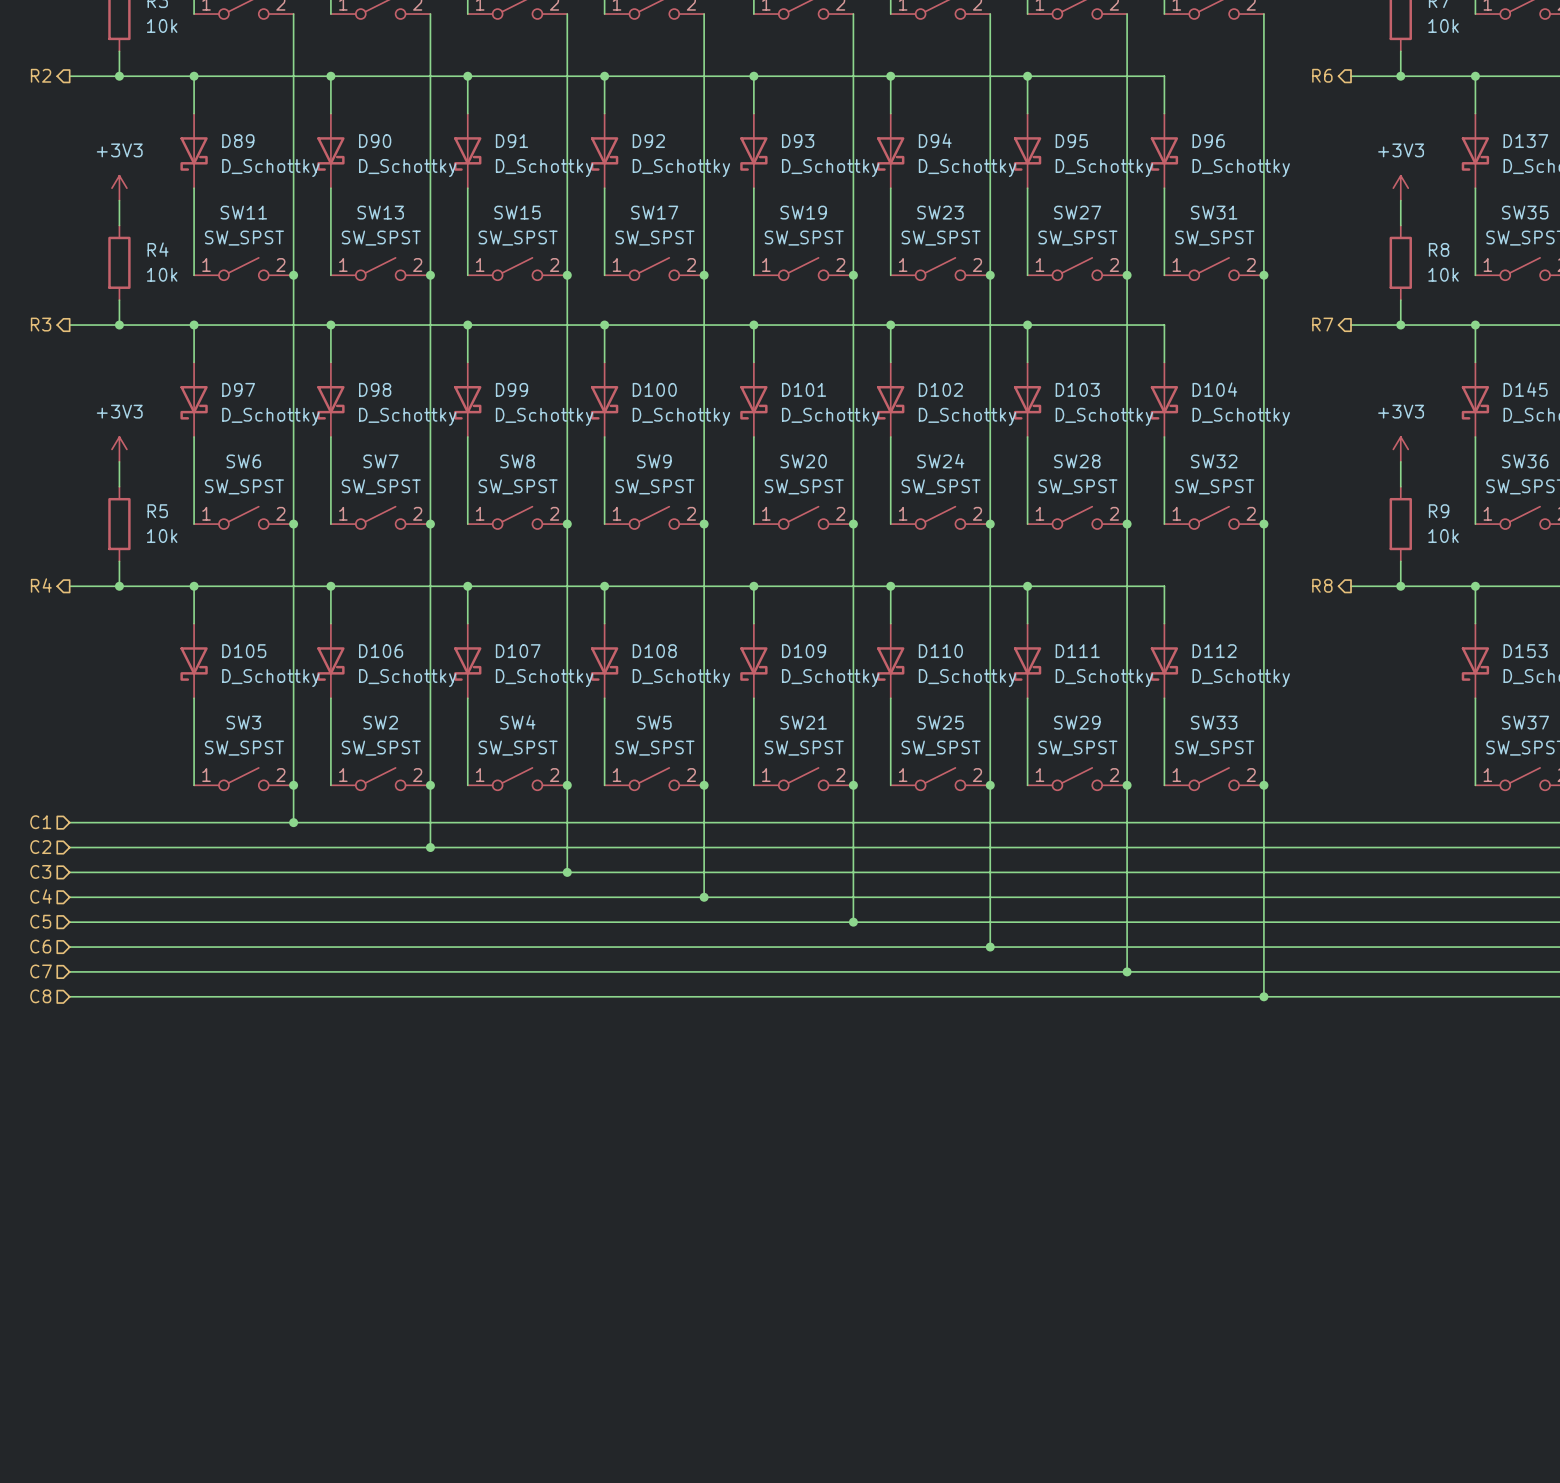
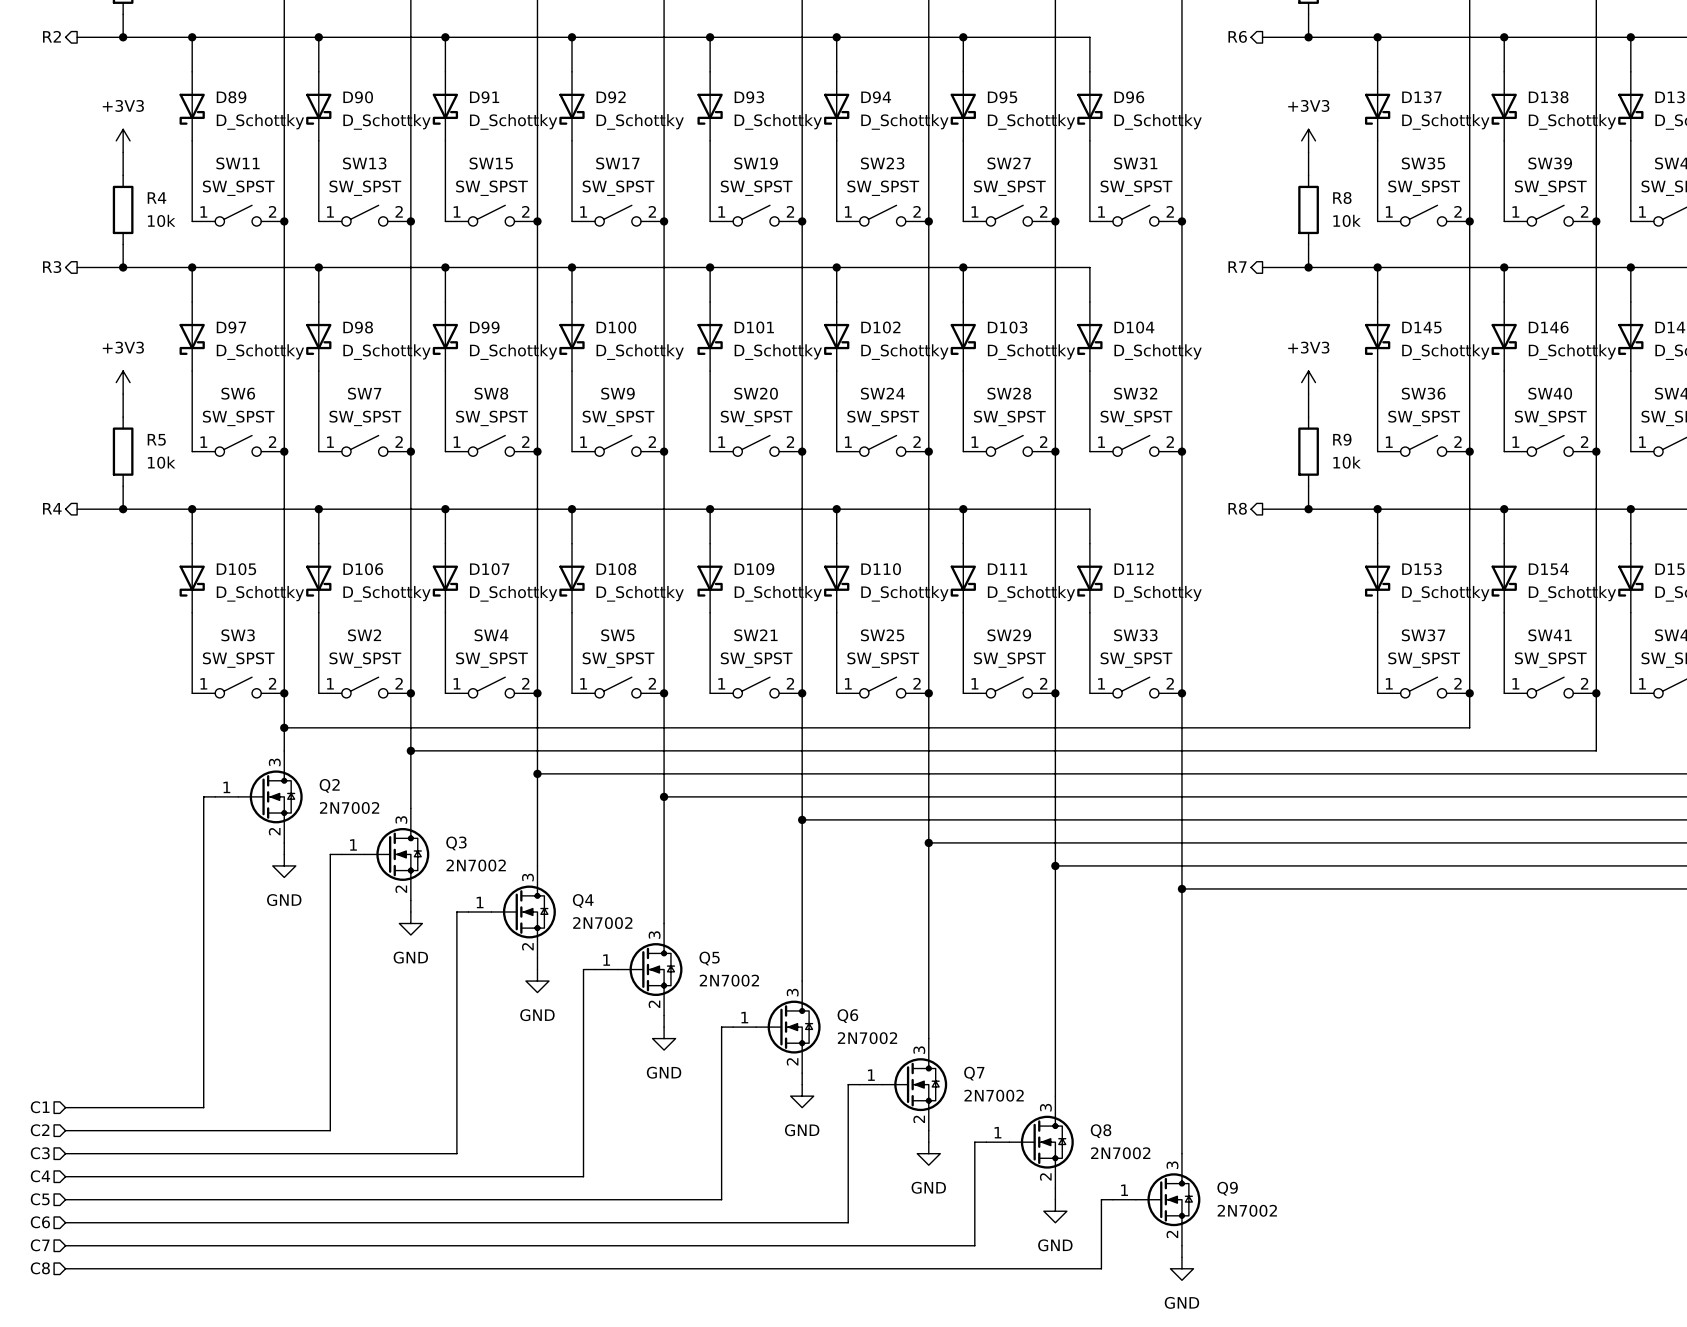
hierarchical label: C1 (40, 822) -> none
wire: (69, 822) (293, 822) -> (284, 750) (284, 727)
hierarchical label: C2 (40, 847) -> none
wire: (69, 847) (430, 847) -> (410, 808) (410, 750)
hierarchical label: C3 (40, 871) -> none
wire: (69, 872) (567, 872) -> (537, 865) (537, 773)
hierarchical label: C4 (41, 896) -> none
wire: (69, 897) (206, 897) -> (65, 1107) (203, 1107) (203, 796)
wire: (218, 897) (704, 897) -> (664, 923) (664, 796)
Q2: none -> 2N7002 (258, 796)
hierarchical label: C5 (40, 921) -> none
wire: (69, 922) (853, 922) -> (802, 981) (802, 819)
hierarchical label: C6 (40, 946) -> none
wire: (69, 947) (990, 947) -> (928, 1038) (928, 842)
wire: none -> (284, 842) (284, 854)
wire: none -> (341, 854) (330, 854) (330, 1130) (65, 1130)
Q3: none -> 2N7002 (385, 854)
hierarchical label: C7 (41, 971) -> none
wire: (69, 971) (1127, 971) -> (1055, 1096) (1055, 865)
power symbol: none -> GND (284, 865)
hierarchical label: C8 (40, 996) -> none
wire: (69, 996) (1263, 996) -> (1181, 1153) (1181, 888)
wire: none -> (410, 900) (410, 911)
wire: none -> (468, 911) (456, 911) (456, 1153) (65, 1153)
Q4: none -> 2N7002 (512, 911)
power symbol: none -> GND (410, 923)
wire: none -> (537, 958) (537, 969)
wire: none -> (595, 969) (583, 969) (583, 1176) (65, 1176)
Q5: none -> 2N7002 (638, 969)
power symbol: none -> GND (537, 981)
wire: none -> (664, 1015) (664, 1027)
wire: none -> (733, 1027) (721, 1027) (721, 1199) (65, 1199)
Q6: none -> 2N7002 (776, 1027)
power symbol: none -> GND (664, 1038)
wire: none -> (802, 1073) (802, 1084)
wire: none -> (859, 1084) (848, 1084) (848, 1222) (65, 1222)
Q7: none -> 2N7002 (903, 1084)
power symbol: none -> GND (802, 1096)
hierarchical label: none -> C1 (40, 1107)
hierarchical label: none -> C2 (40, 1130)
wire: none -> (928, 1130) (928, 1142)
wire: none -> (986, 1142) (974, 1142) (974, 1245) (65, 1245)
Q8: none -> 2N7002 (1030, 1142)
hierarchical label: none -> C3 (40, 1153)
power symbol: none -> GND (928, 1153)
hierarchical label: none -> C4 (40, 1176)
wire: none -> (1055, 1188) (1055, 1199)
hierarchical label: none -> C5 (40, 1199)
wire: none -> (1112, 1199) (1101, 1199) (1101, 1268) (65, 1268)
Q9: none -> 2N7002 (1156, 1199)
power symbol: none -> GND (1055, 1211)
hierarchical label: none -> C6 (40, 1222)
hierarchical label: none -> C7 (40, 1245)
wire: none -> (1181, 1245) (1181, 1257)
hierarchical label: none -> C8 (40, 1268)
power symbol: none -> GND (1181, 1268)

